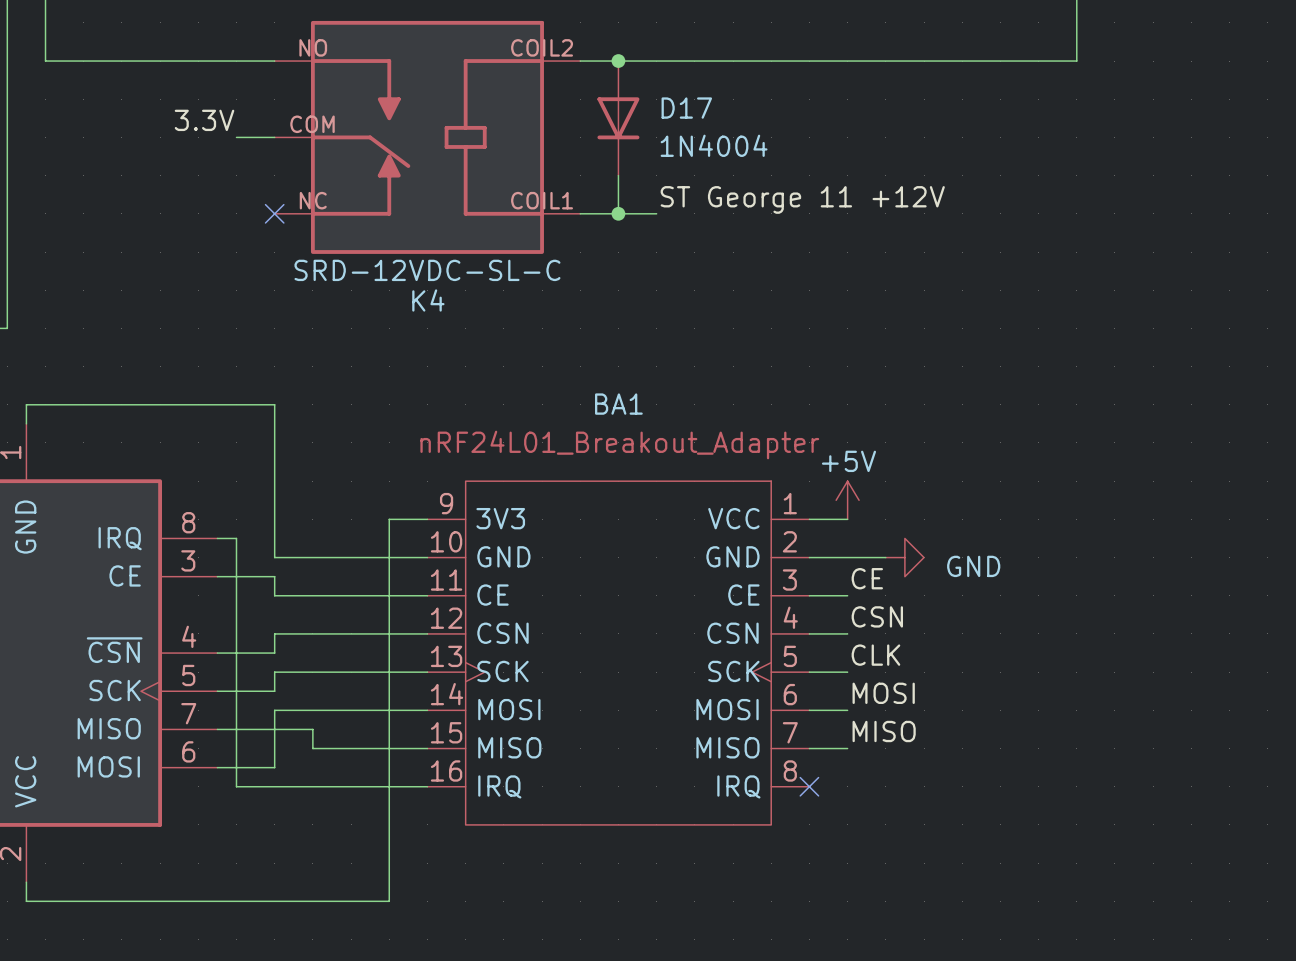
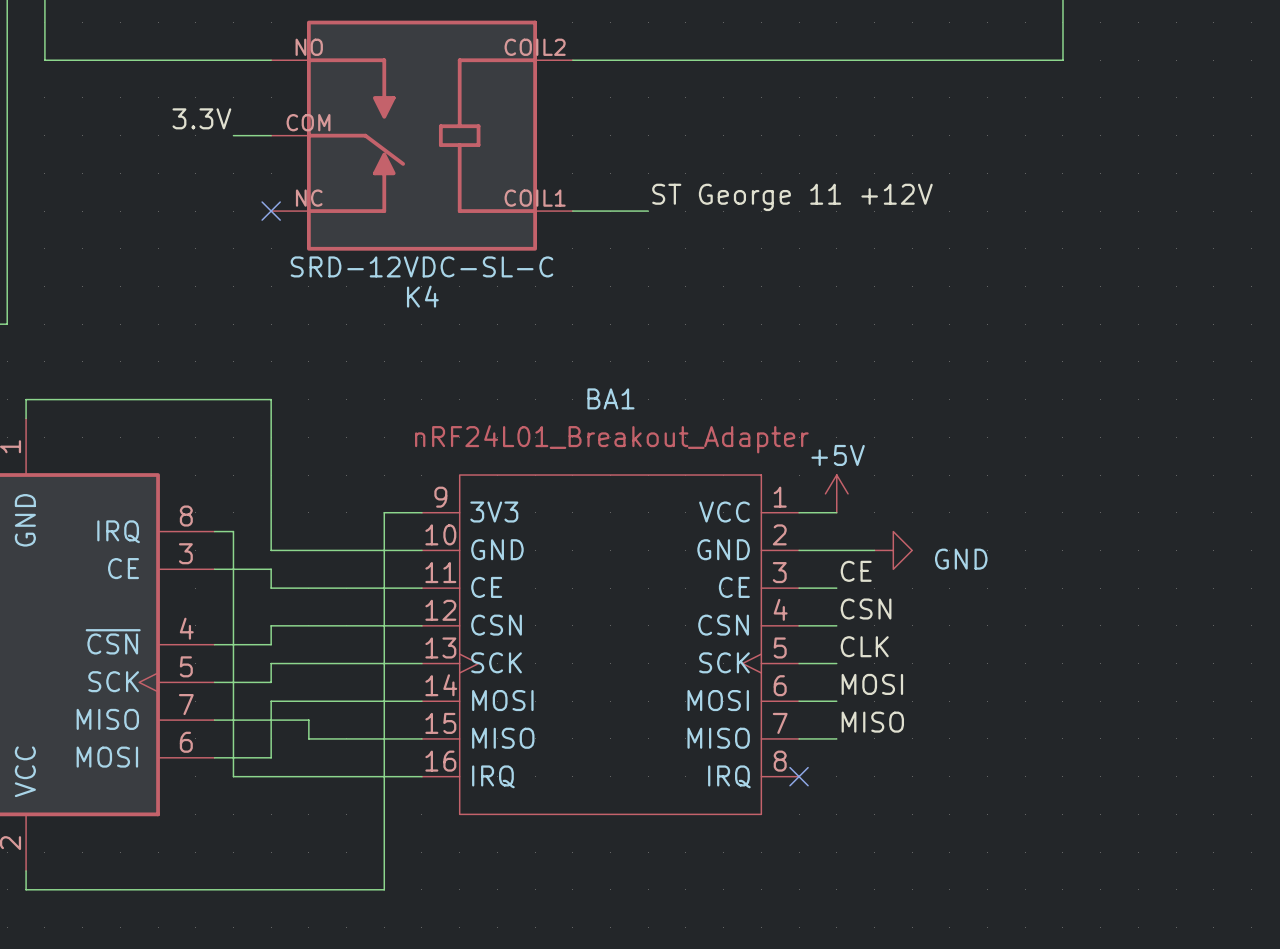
junction: (618, 61) -> none
D17: 1N4004 (618, 118) -> none
wire: (618, 175) (618, 213) -> none
junction: (618, 213) -> none

